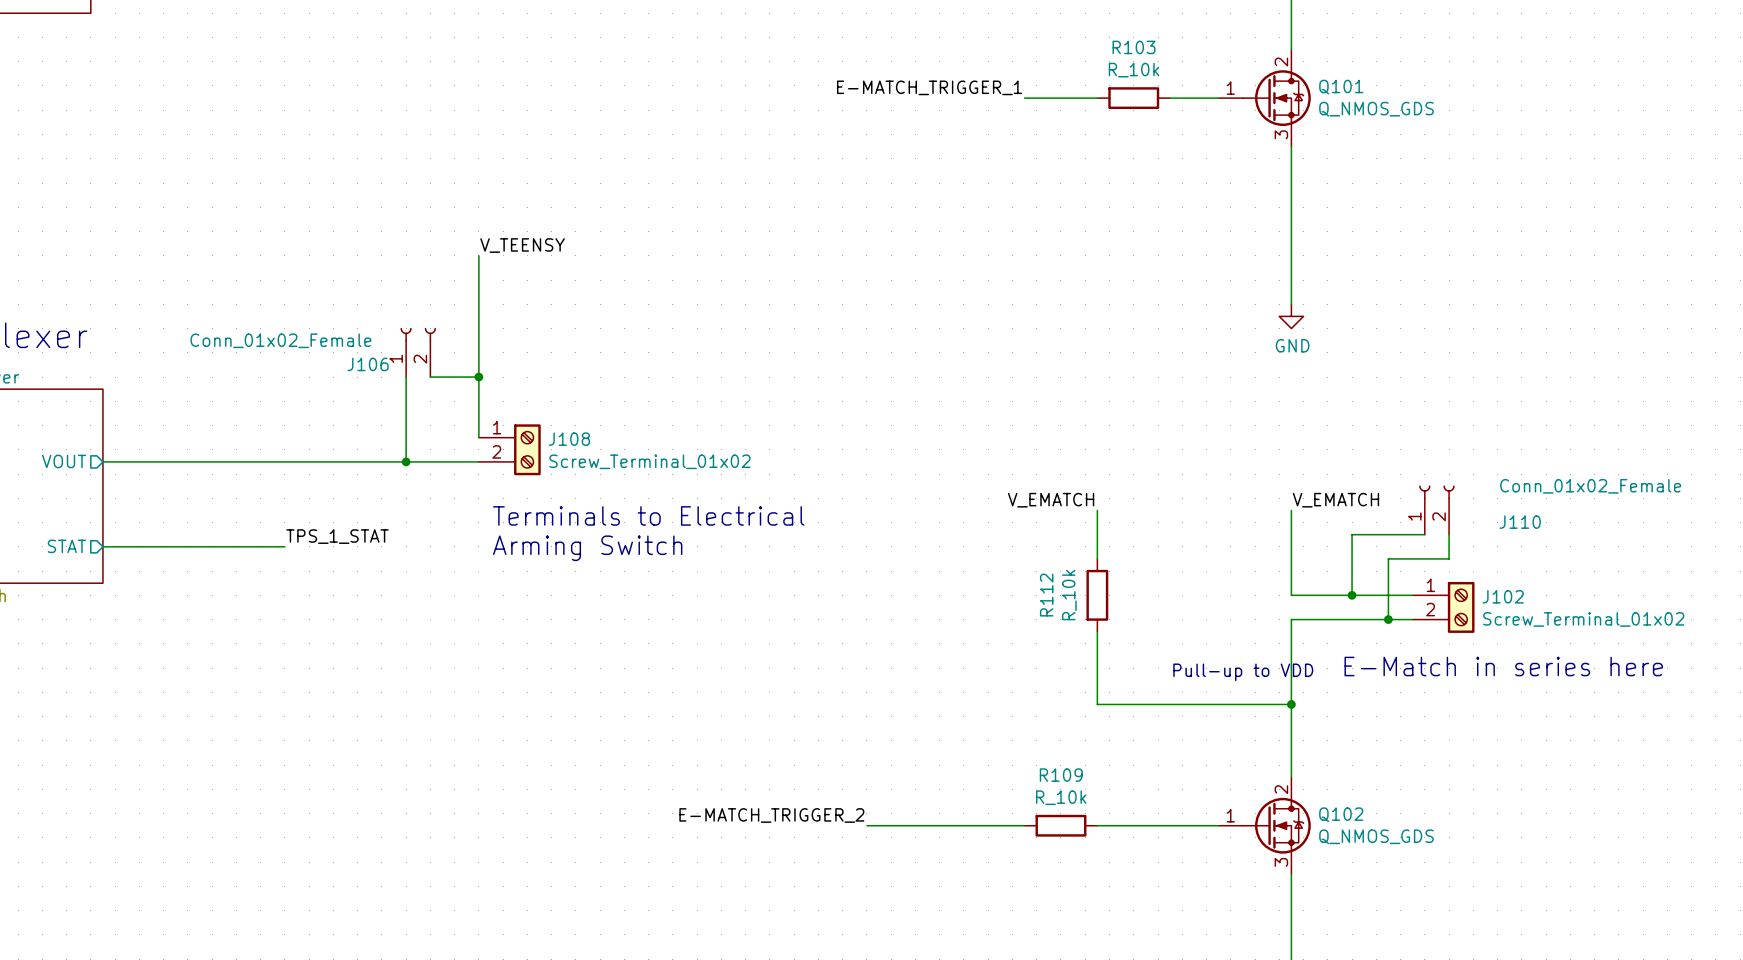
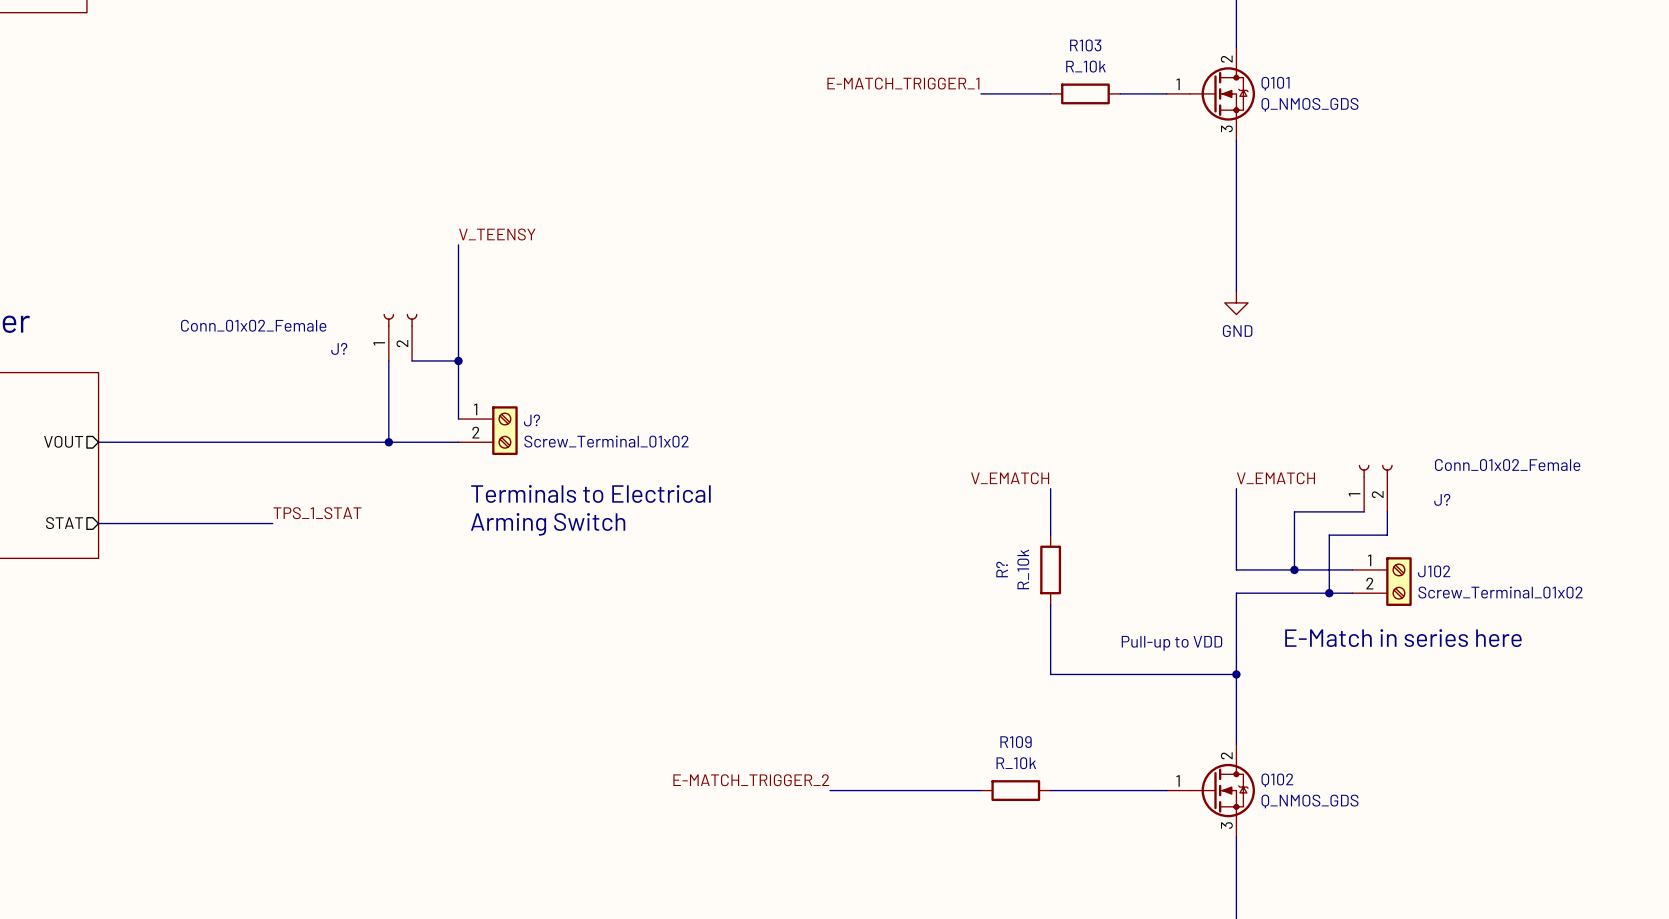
J106 name: J106 (368, 364) -> J? (339, 348)
J108 name: J108 (569, 439) -> J? (532, 420)
J110 name: J110 (1520, 522) -> J? (1442, 499)
R112 name: R112 (1046, 595) -> R? (1002, 569)

